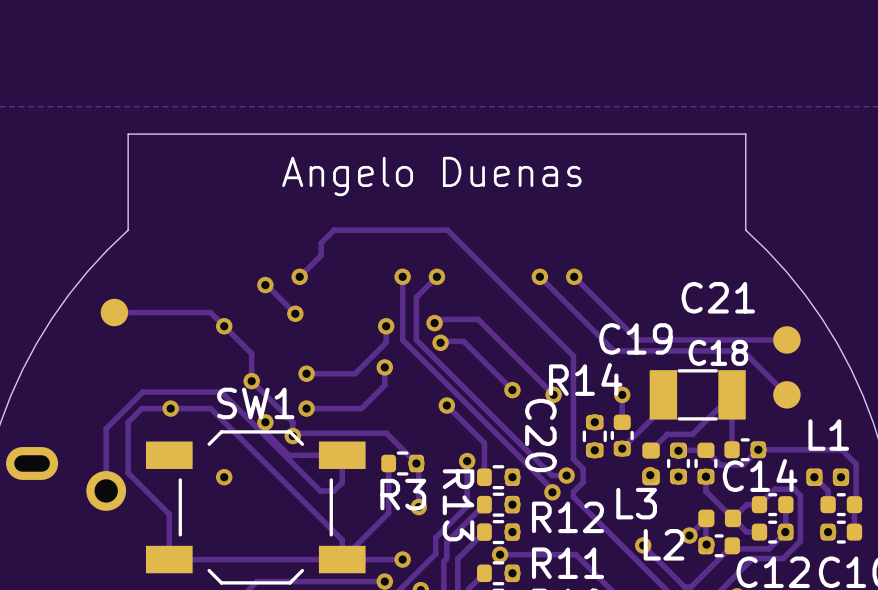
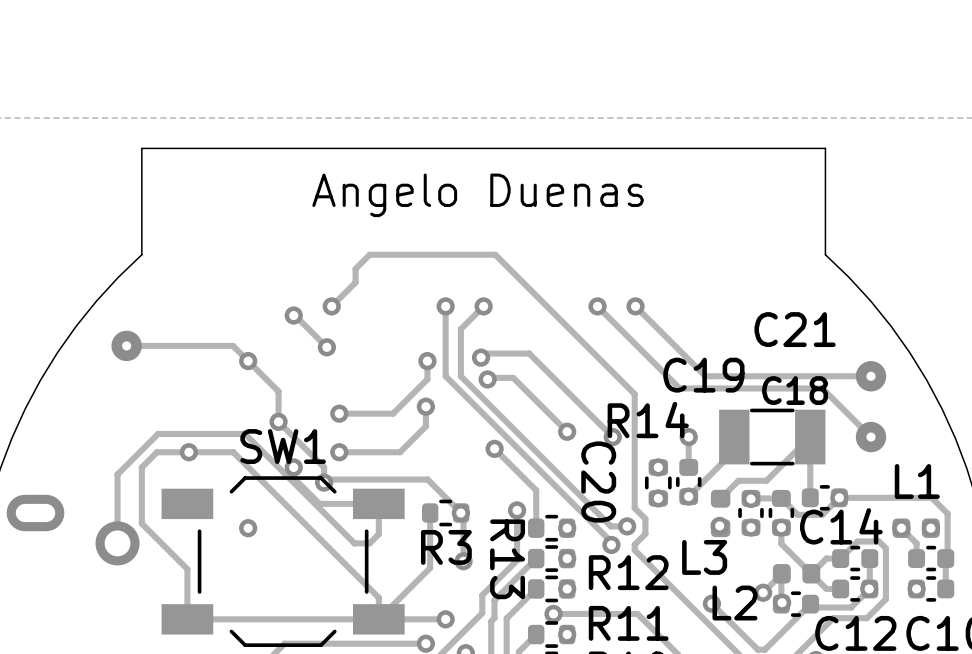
part footprint: [100, 298, 129, 327] -> [111, 330, 142, 362]
part footprint: [773, 326, 801, 354] -> [855, 361, 887, 392]
part footprint: [773, 381, 801, 409] -> [855, 421, 887, 453]

